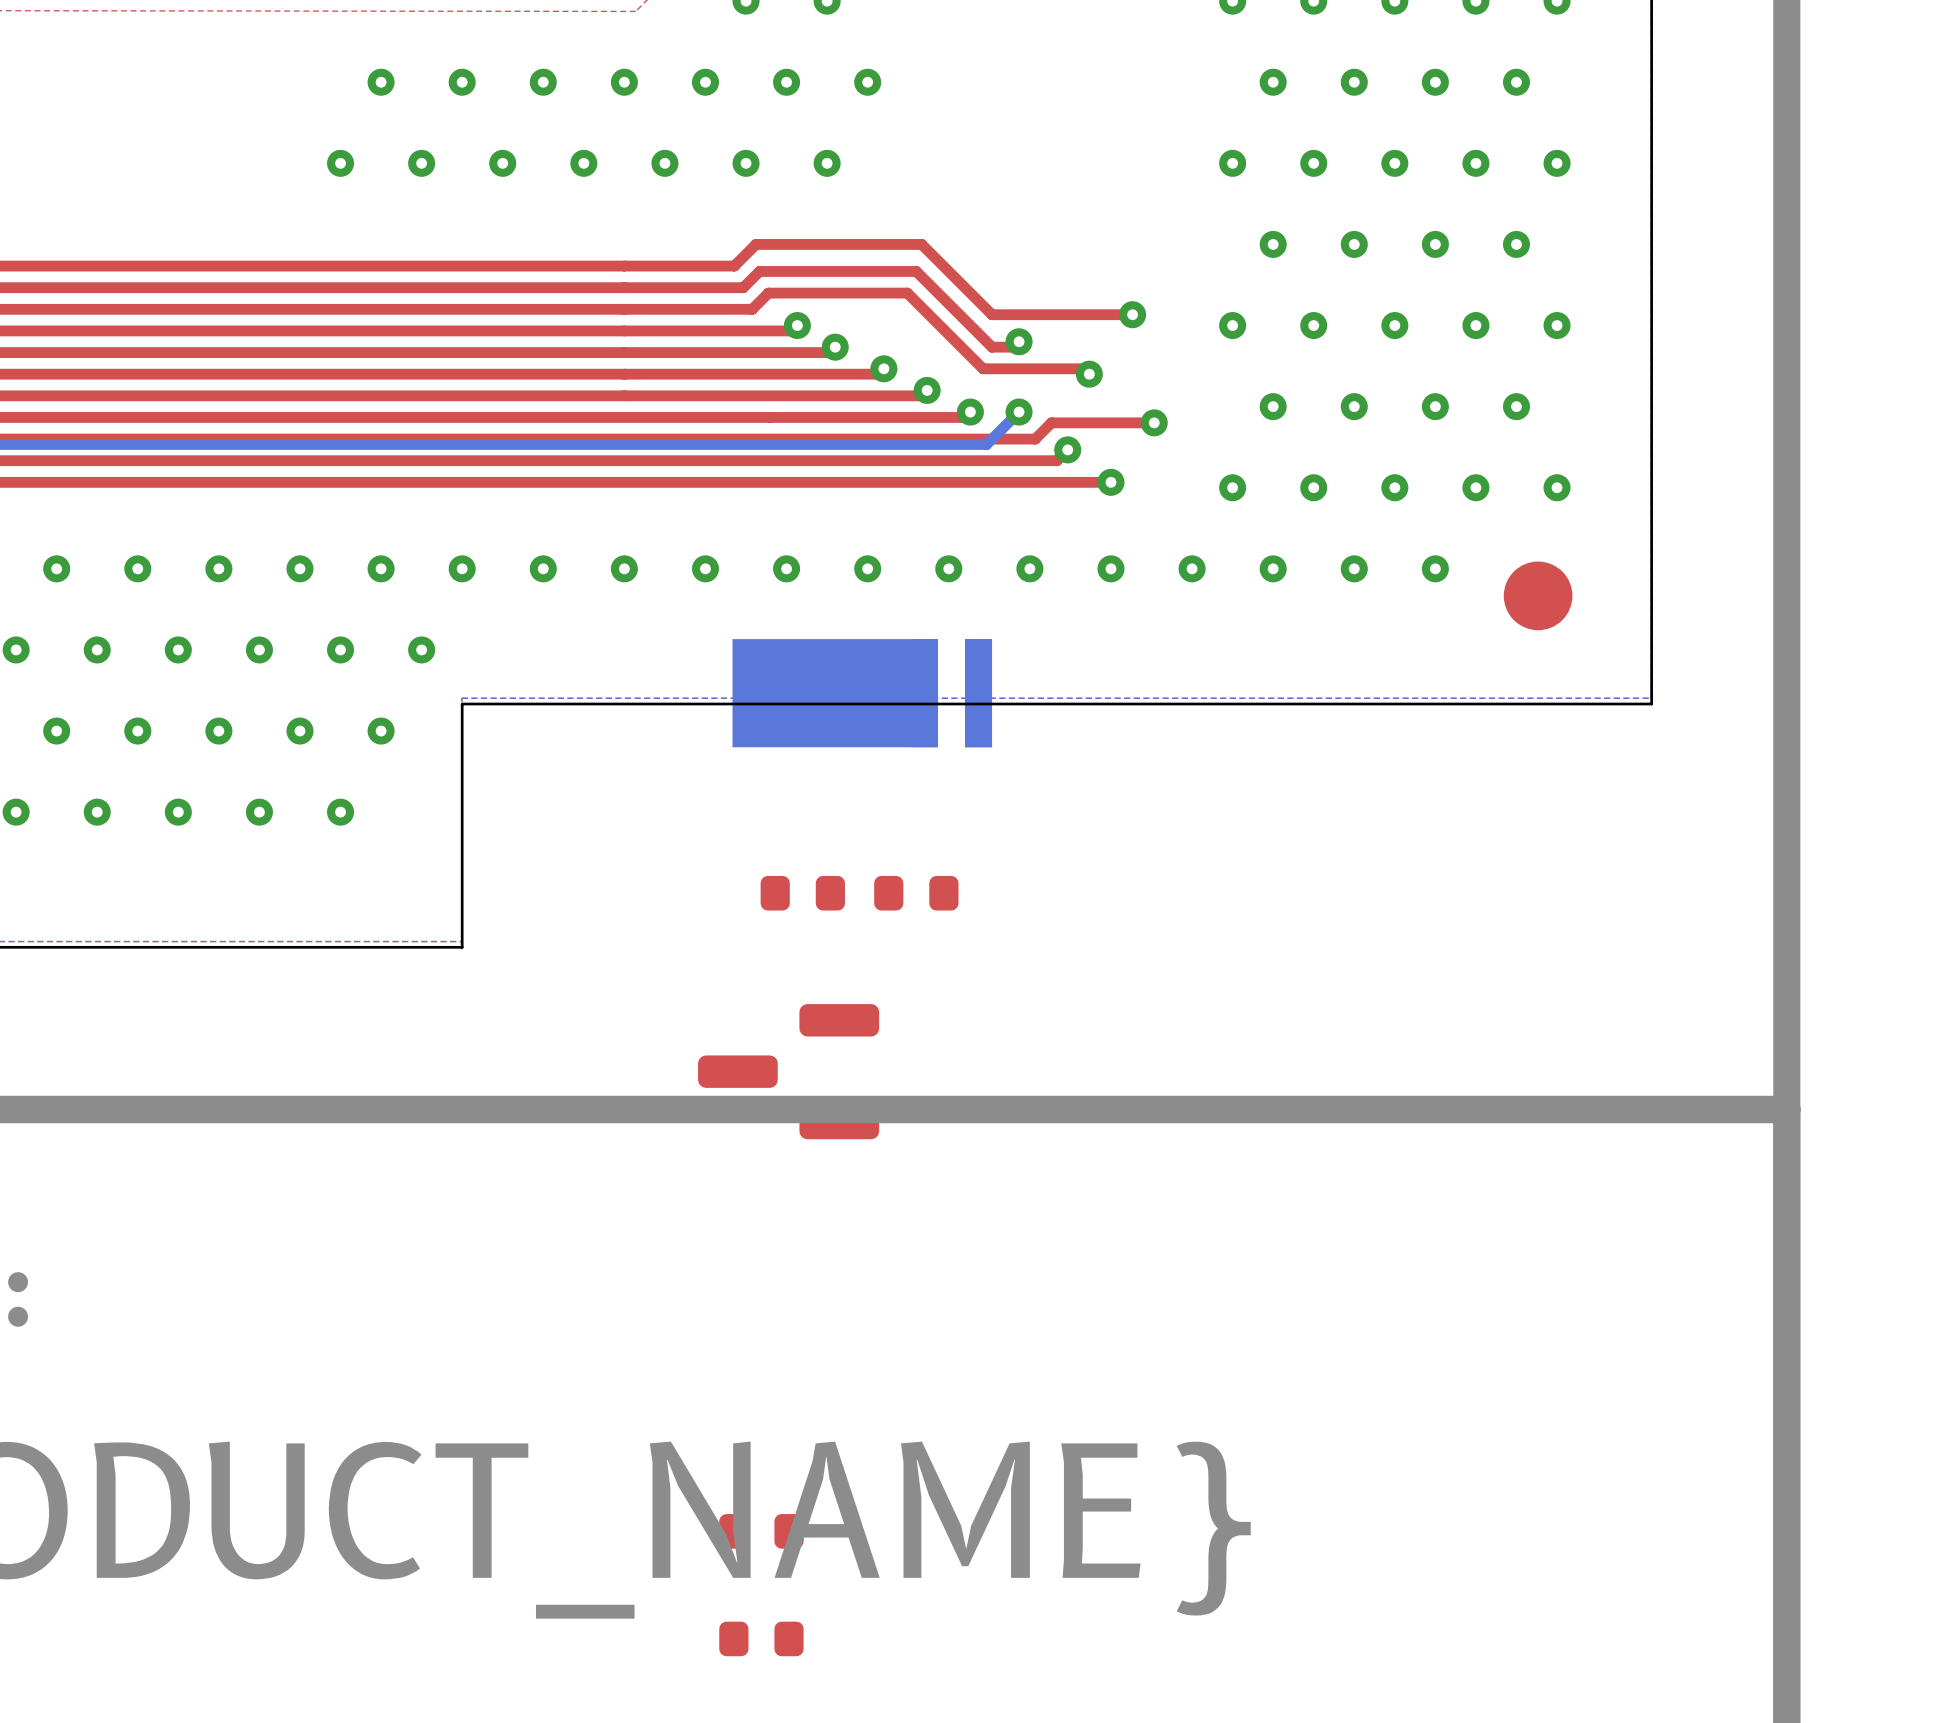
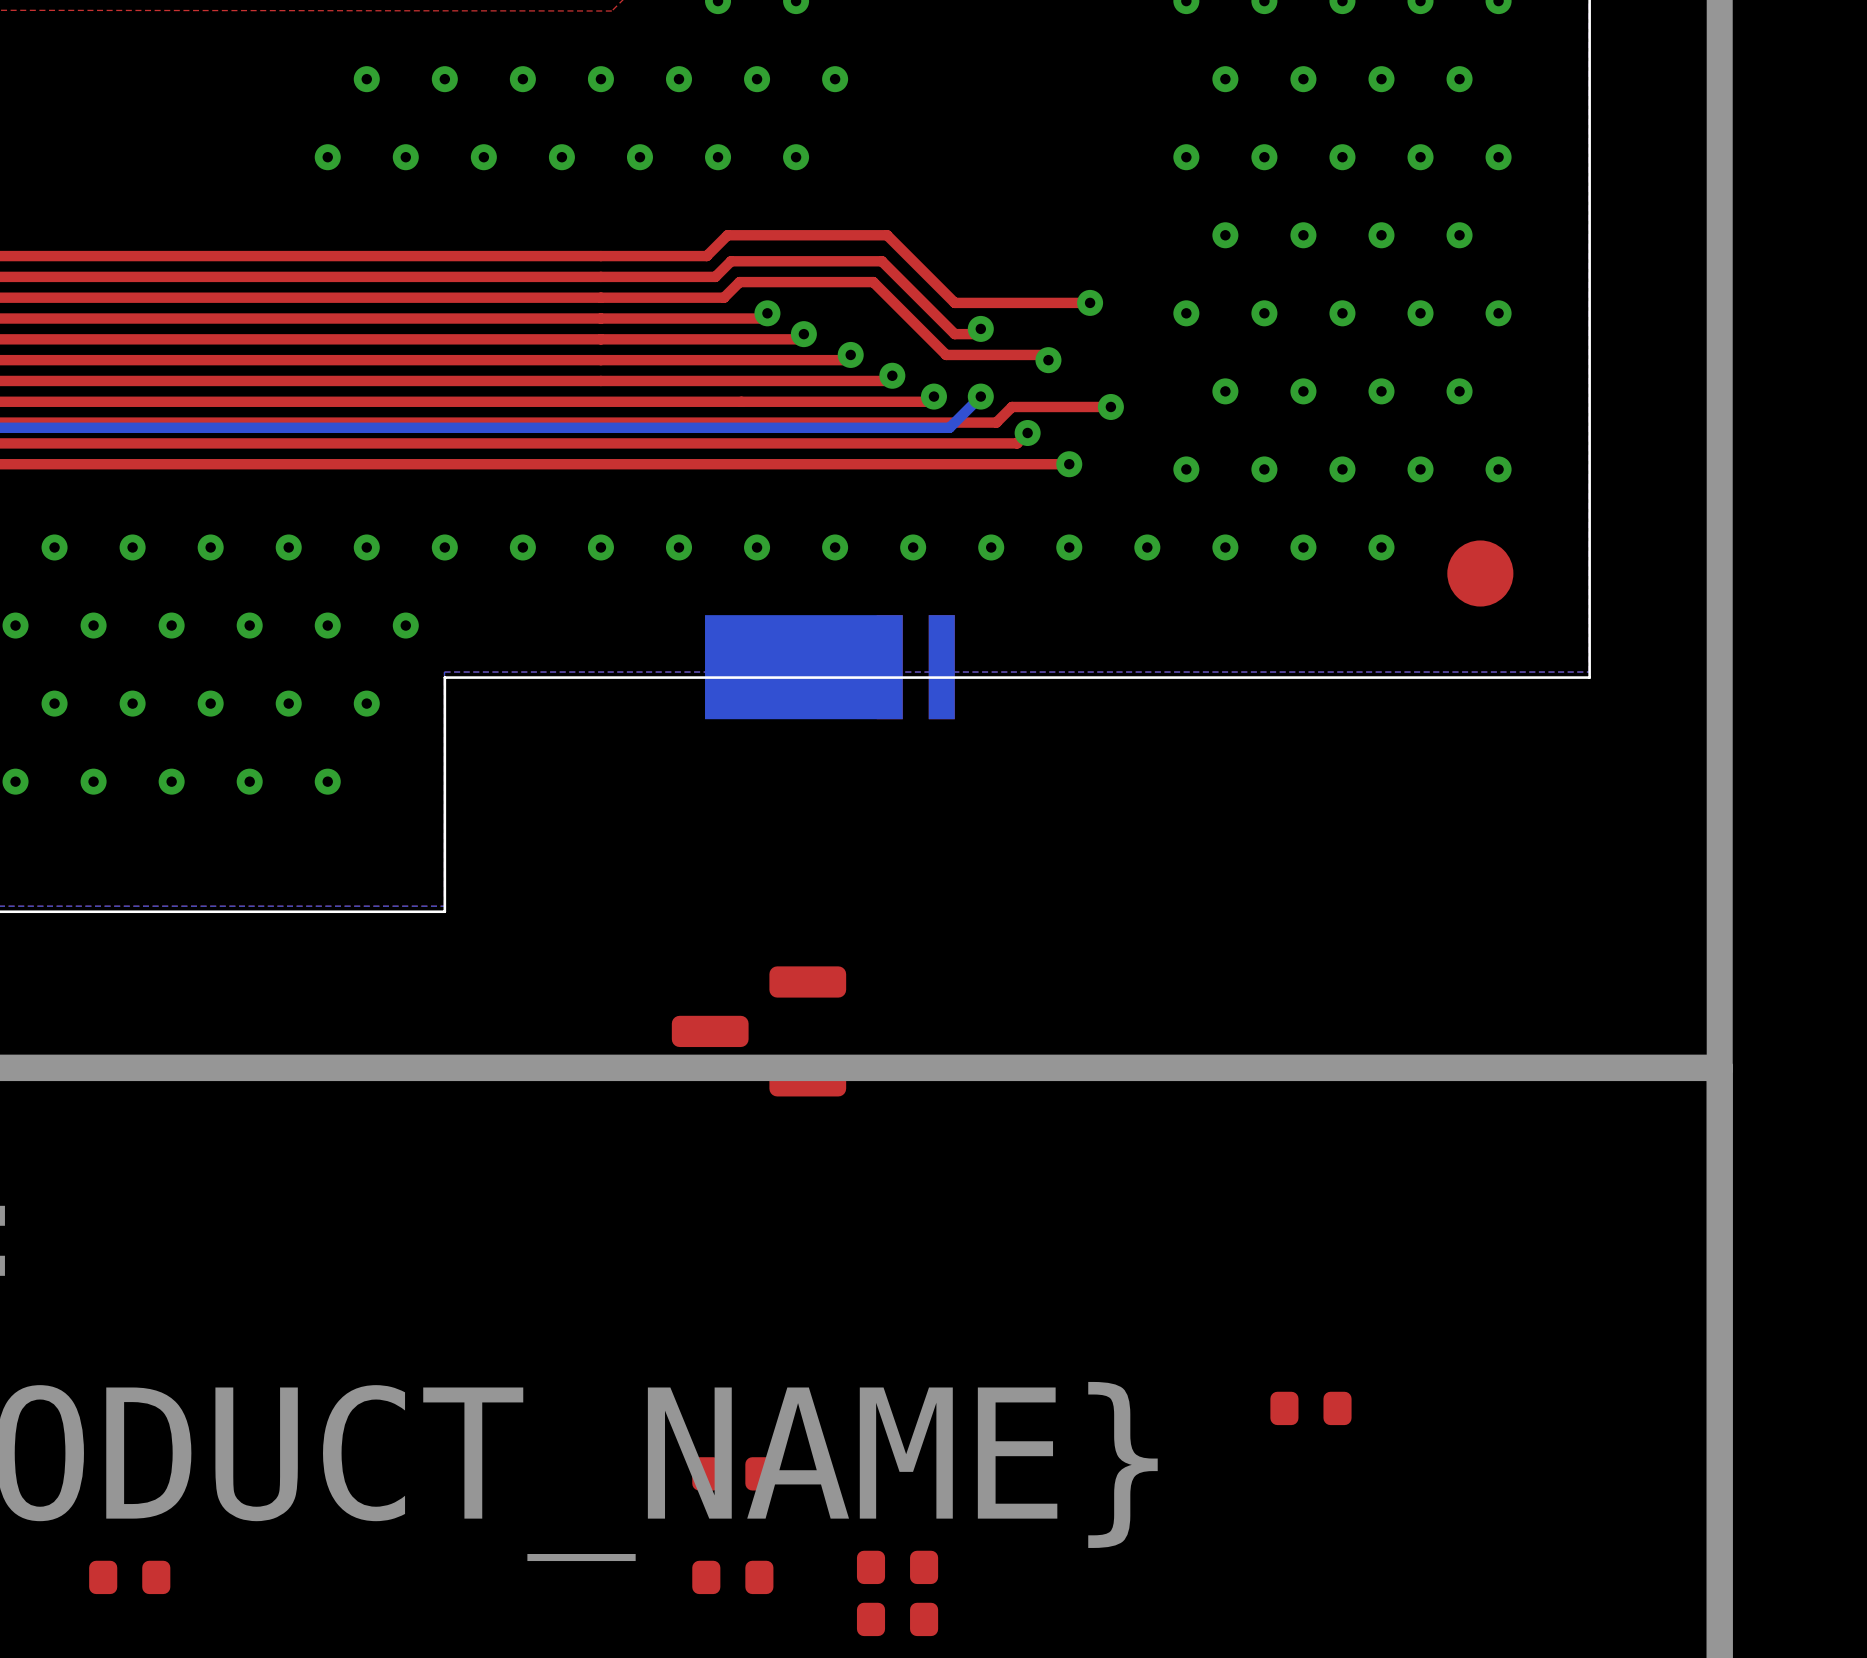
part: (802, 893) -> none
part: (916, 893) -> none
part: none -> (1310, 1408)
part: none -> (897, 1567)
part: none -> (129, 1577)
part: none -> (897, 1619)

